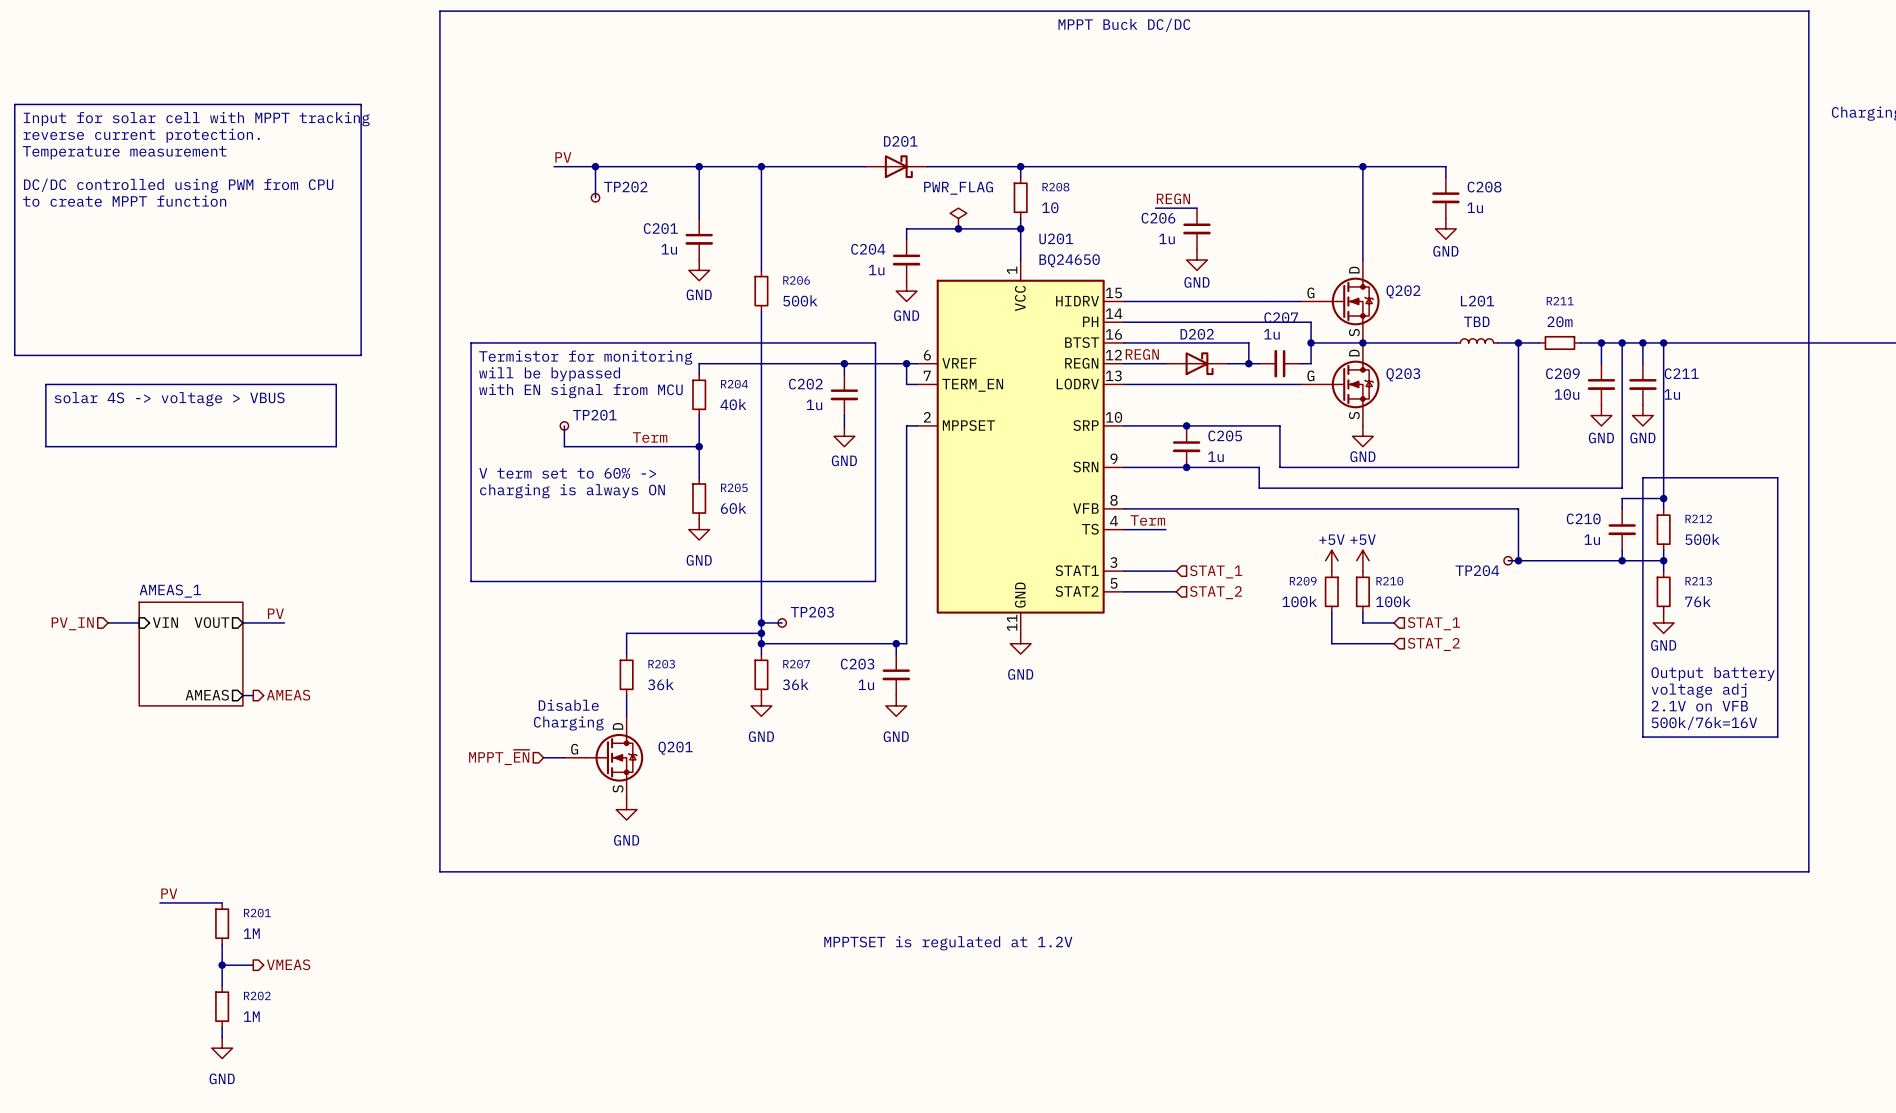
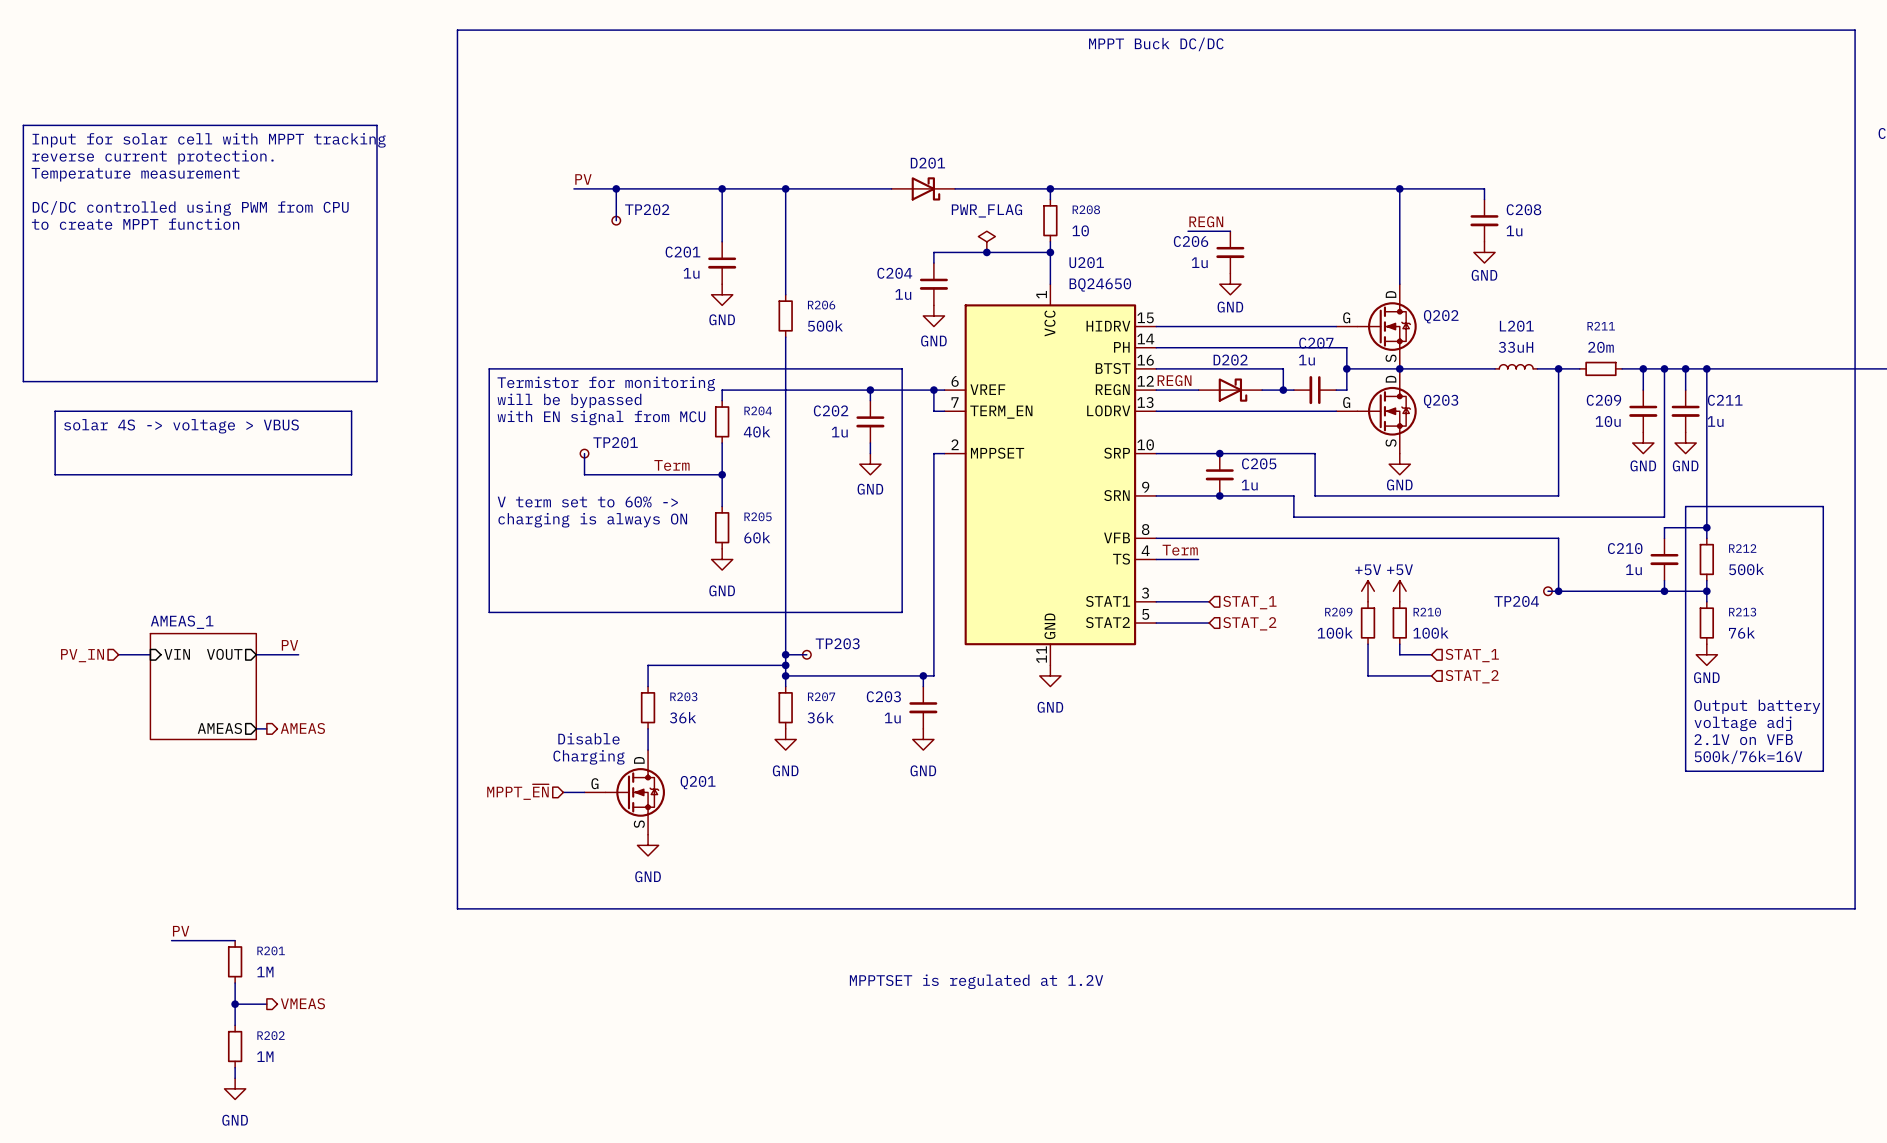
L201 value: TBD (1476, 321) -> 33uH (1516, 347)

